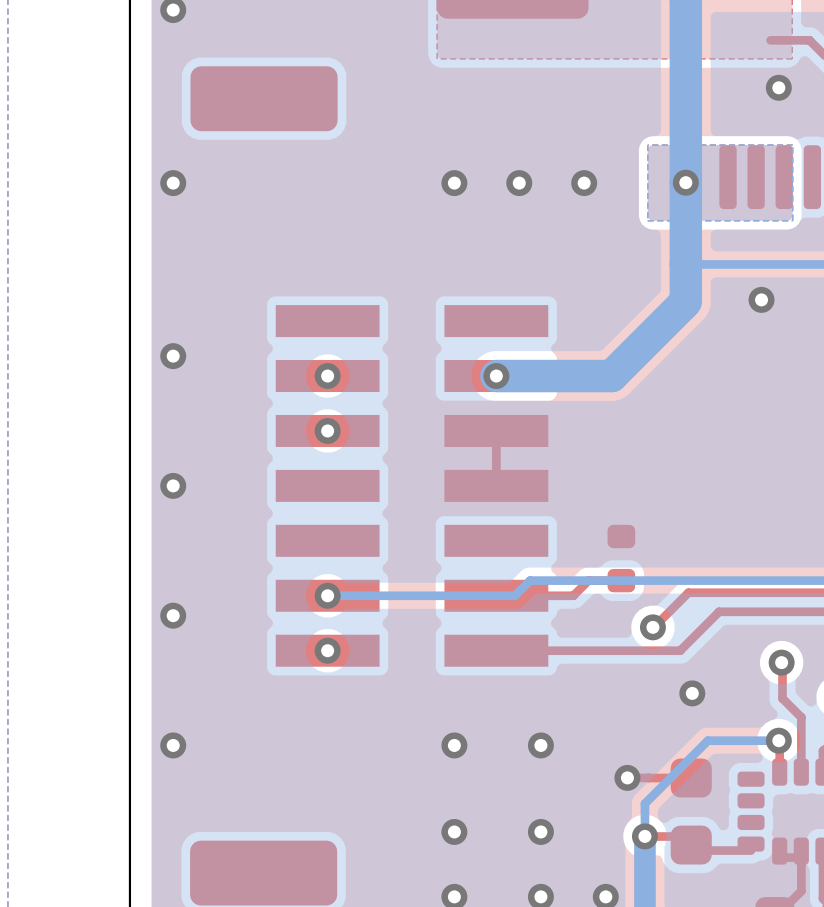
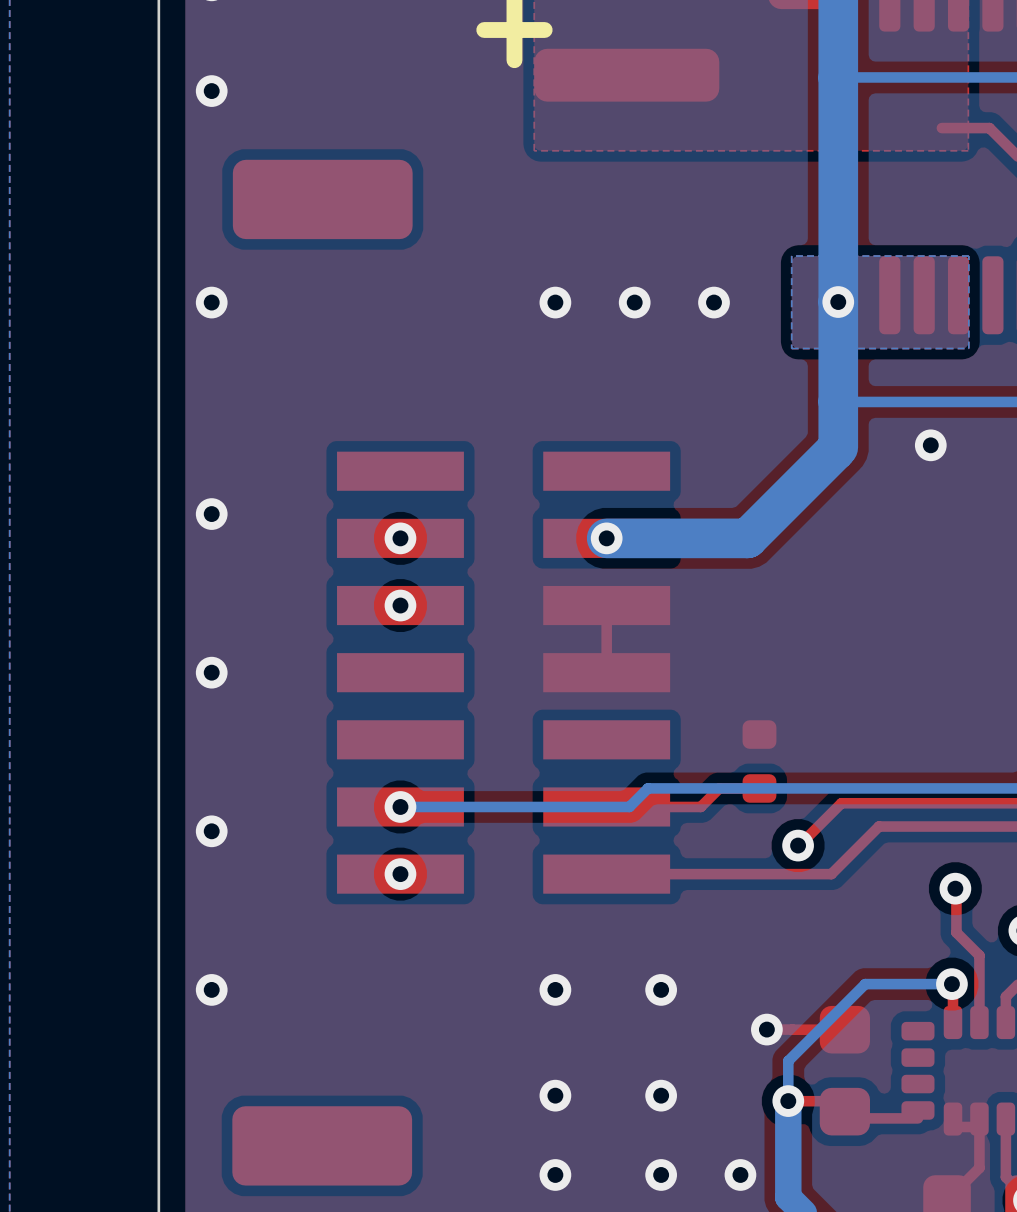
via: (778, 87) -> none
via: (692, 693) -> none

